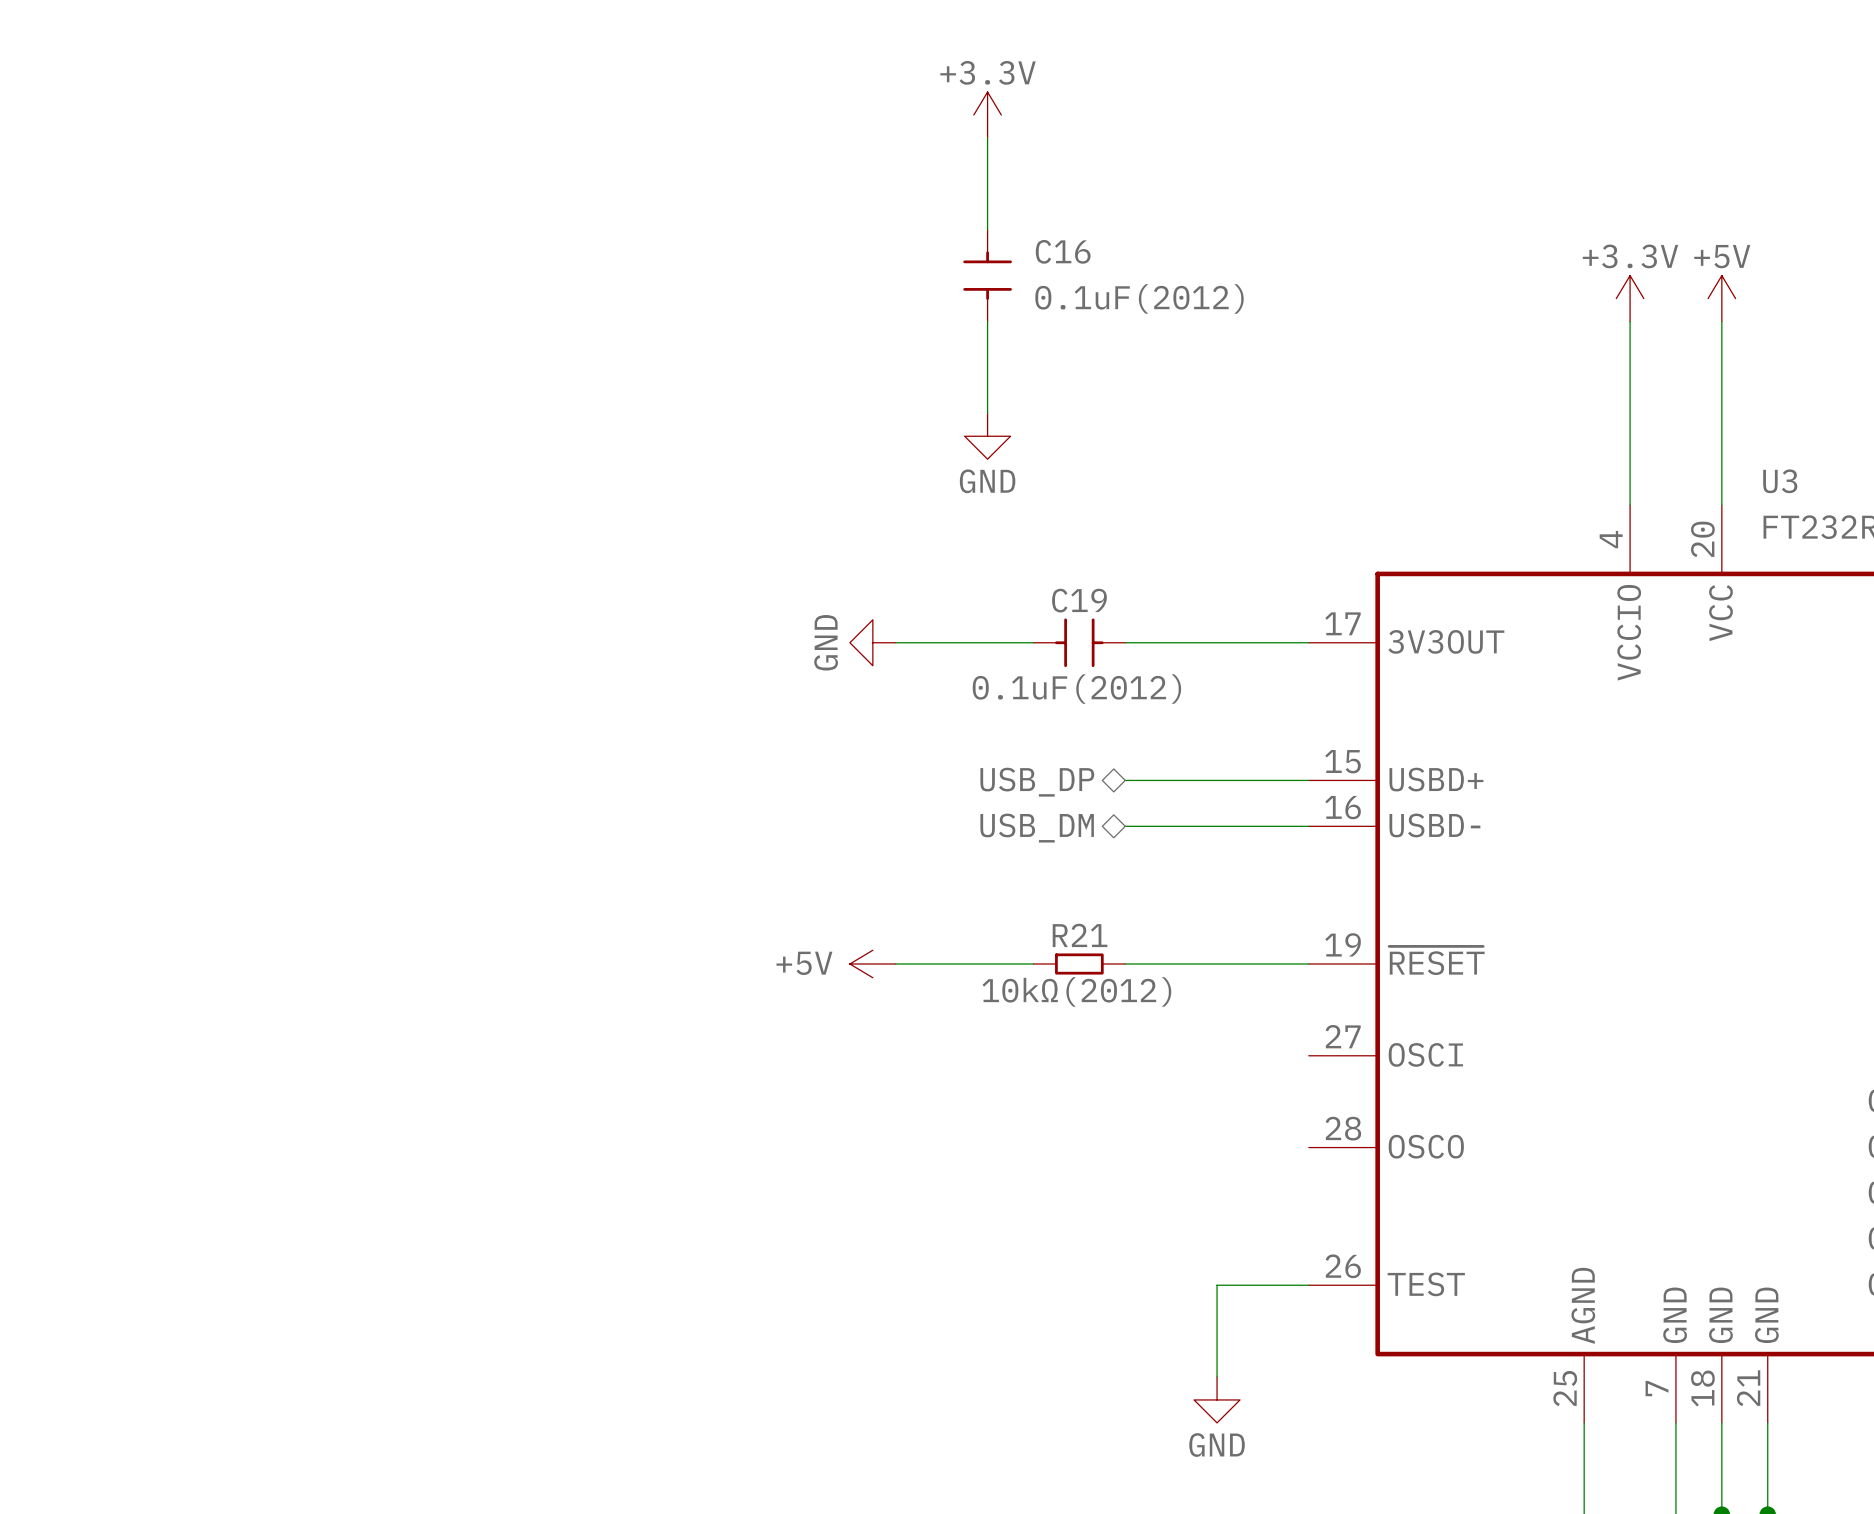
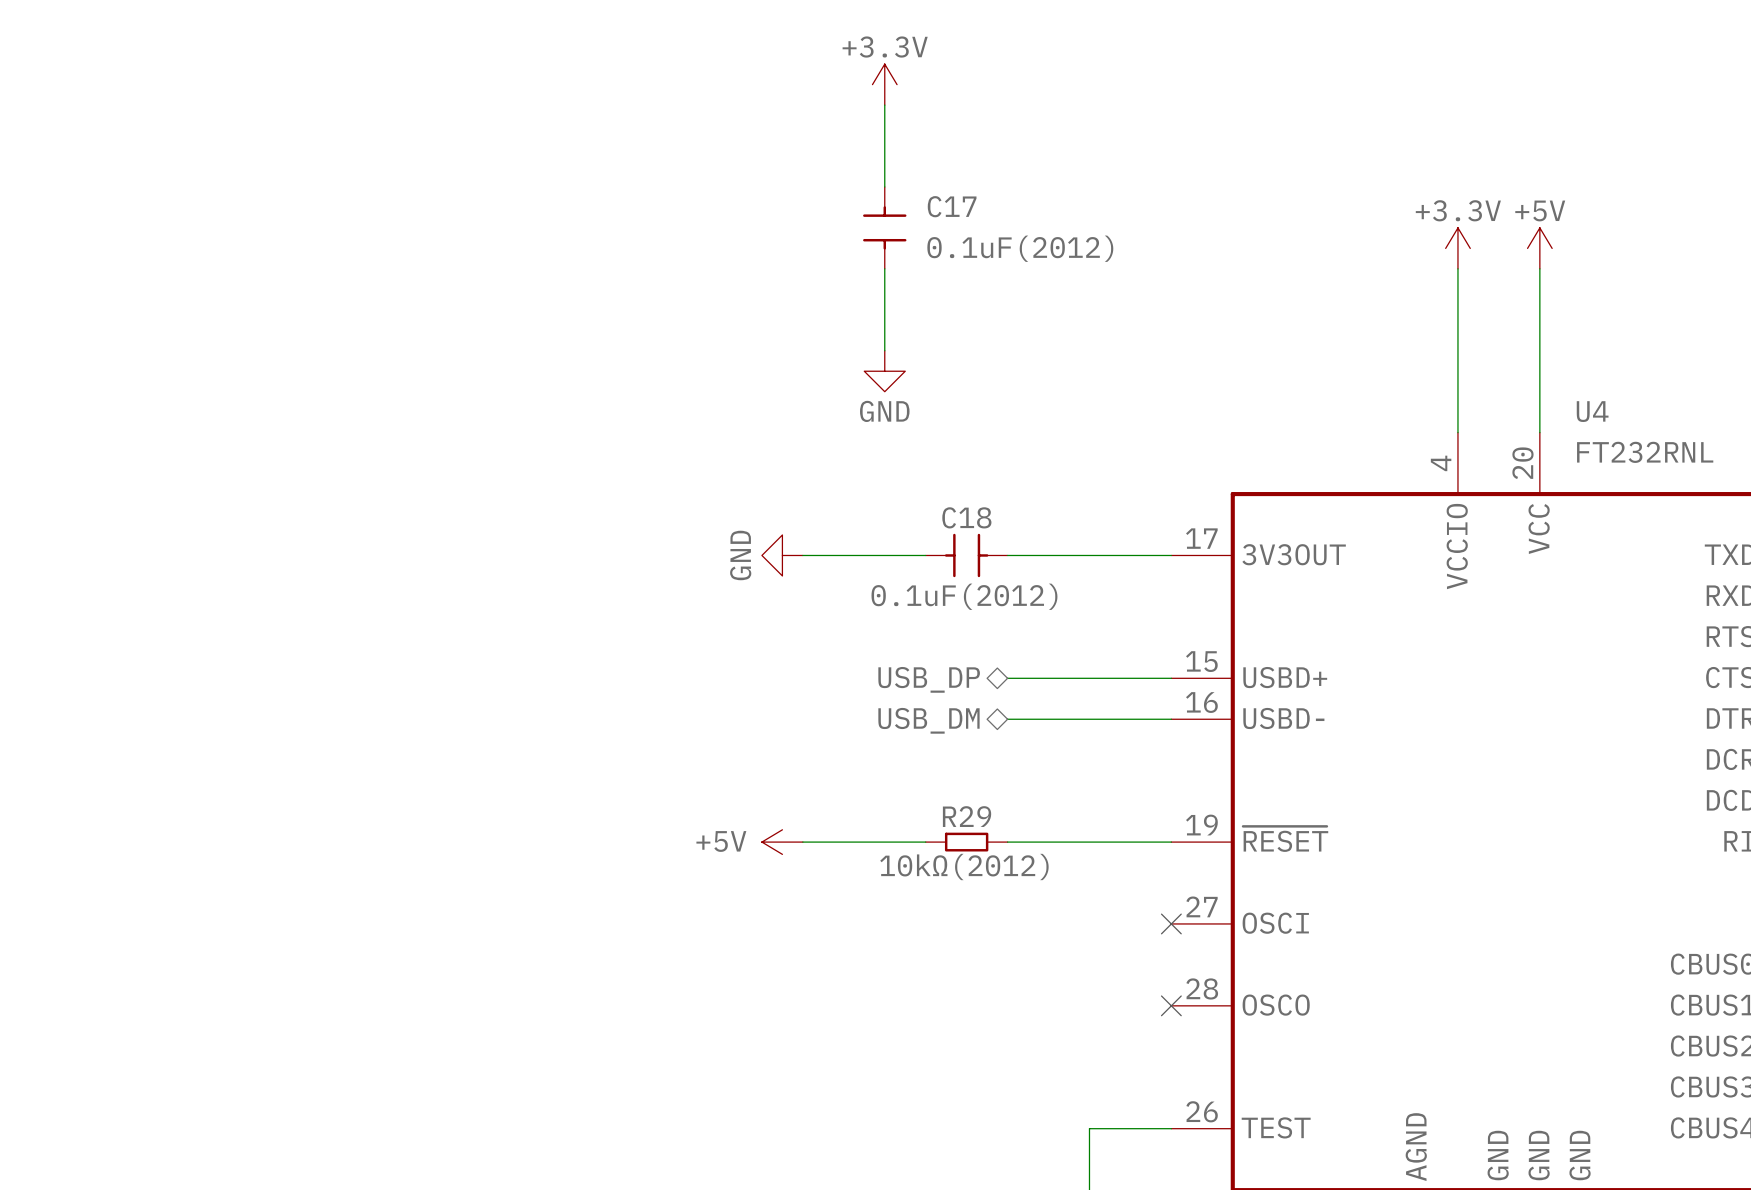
C16 name: C16 (1063, 251) -> C17 (952, 206)
U3 name: U3 (1780, 481) -> U4 (1592, 411)
C19 name: C19 (1079, 600) -> C18 (966, 517)
R21 name: R21 (1080, 935) -> R29 (967, 816)
no-connect mark: none -> (1171, 923)
no-connect mark: none -> (1171, 1005)

